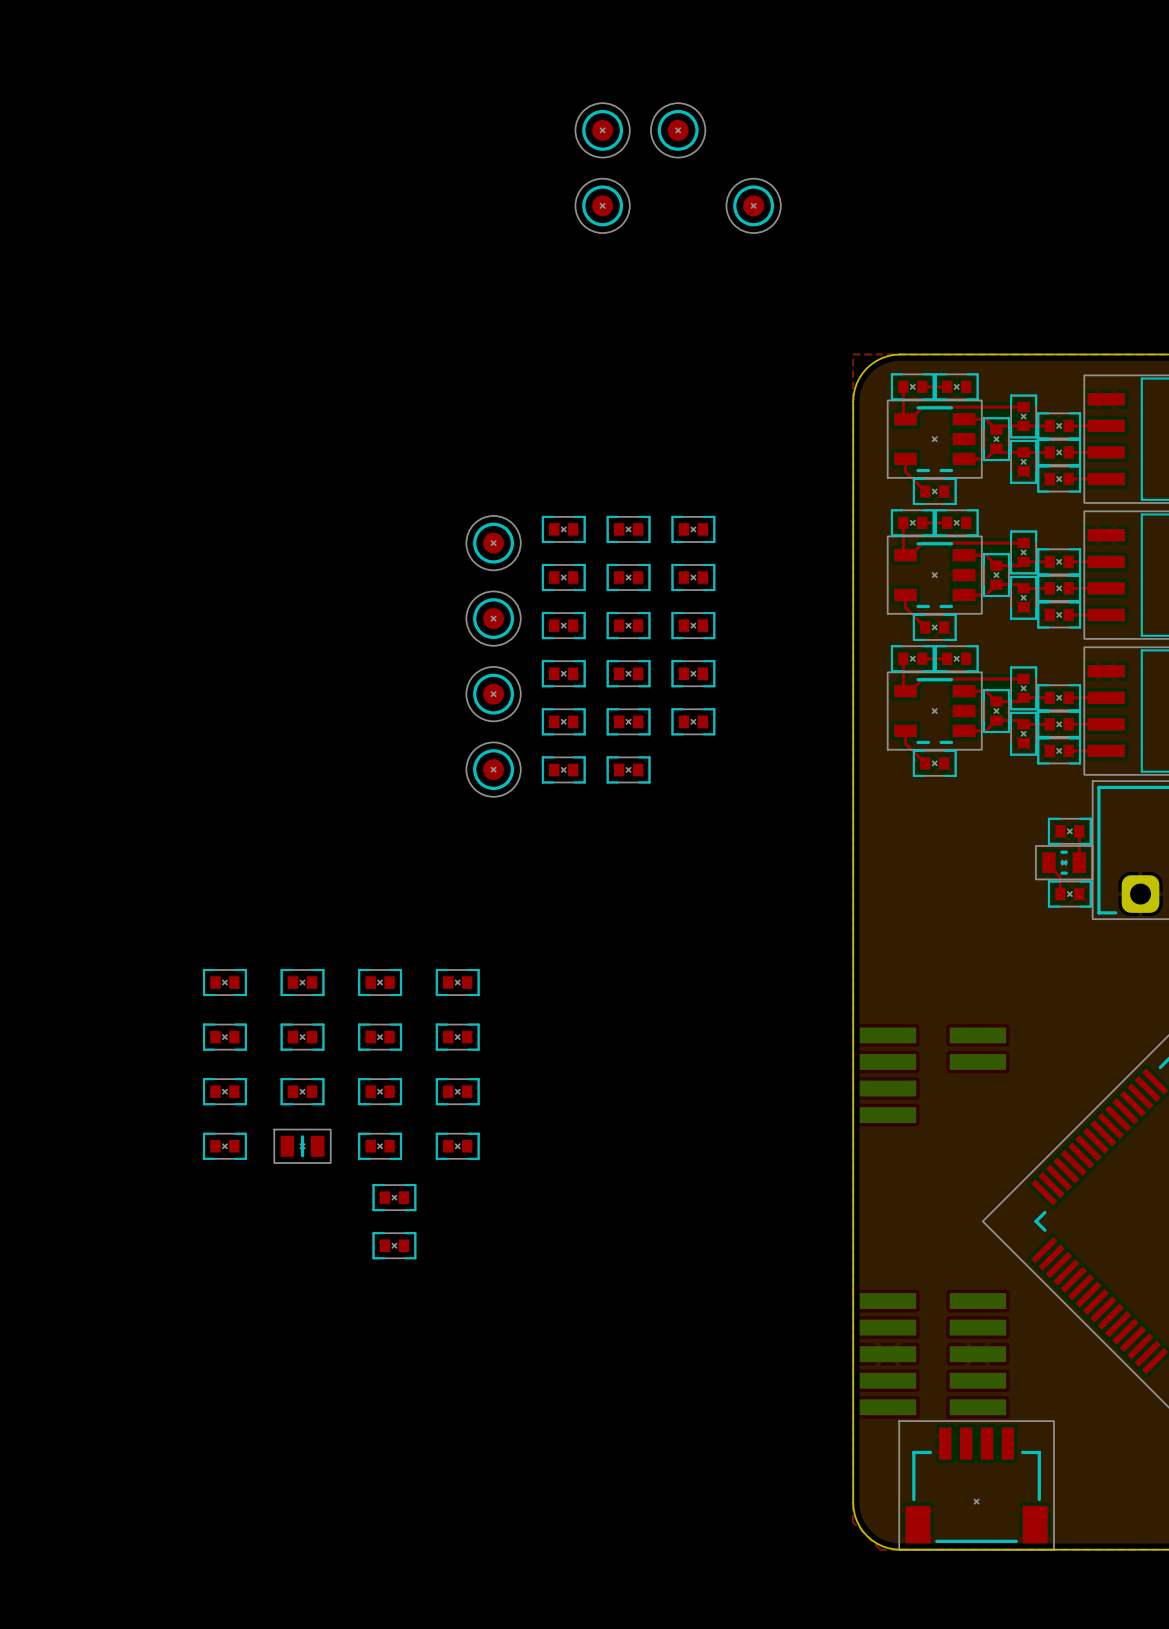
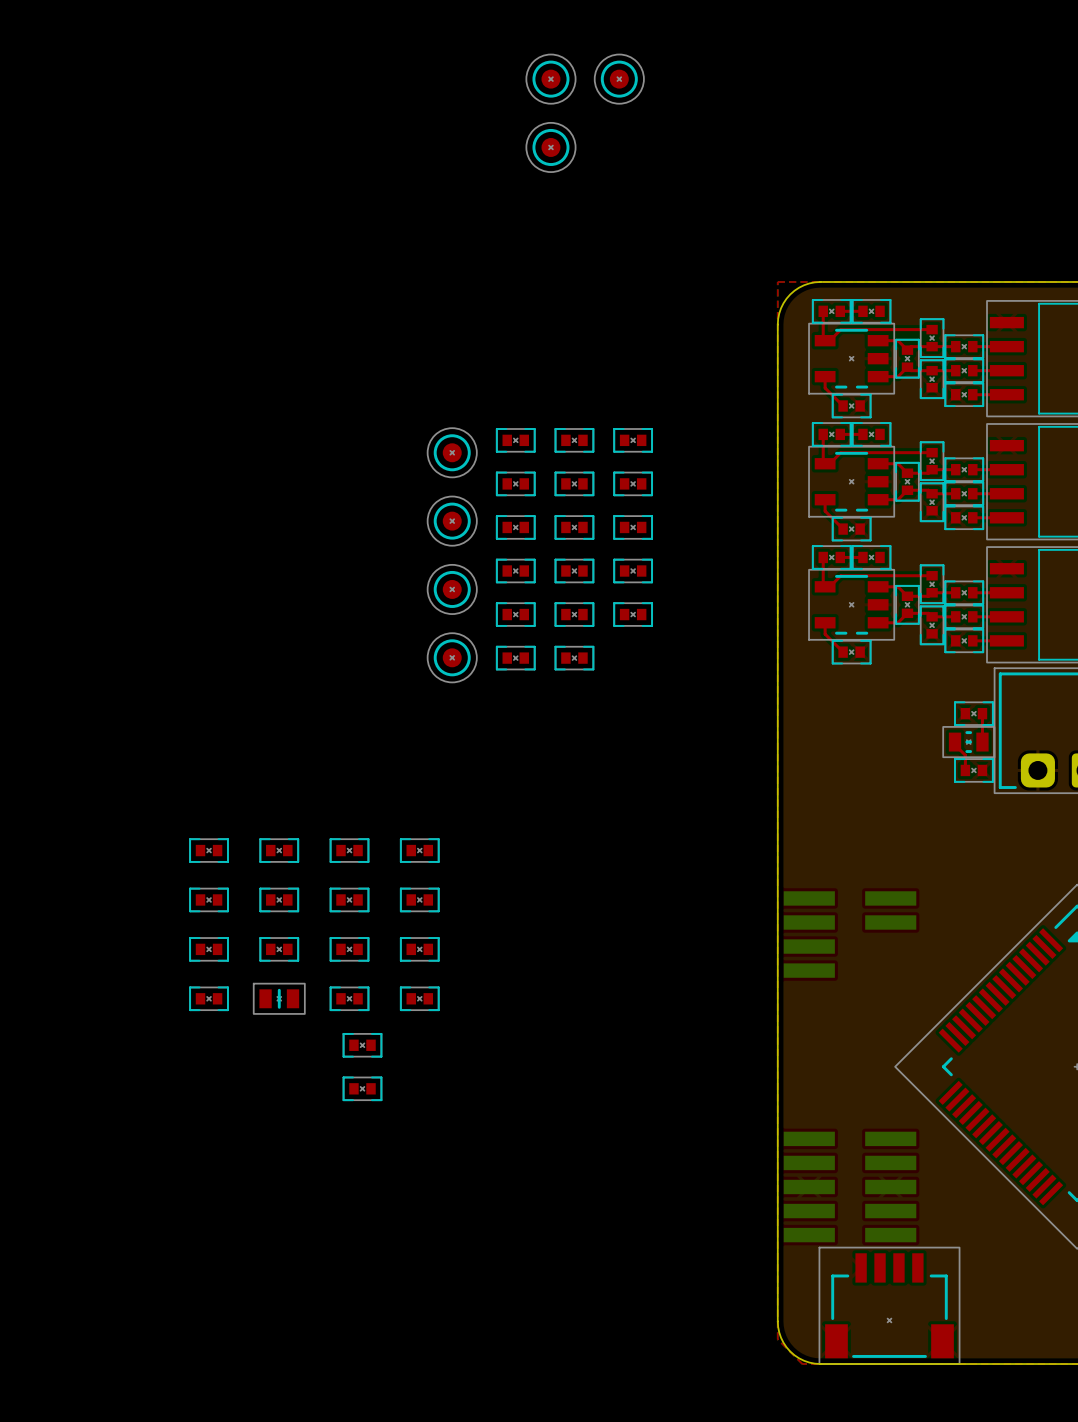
part: (753, 205) -> none

